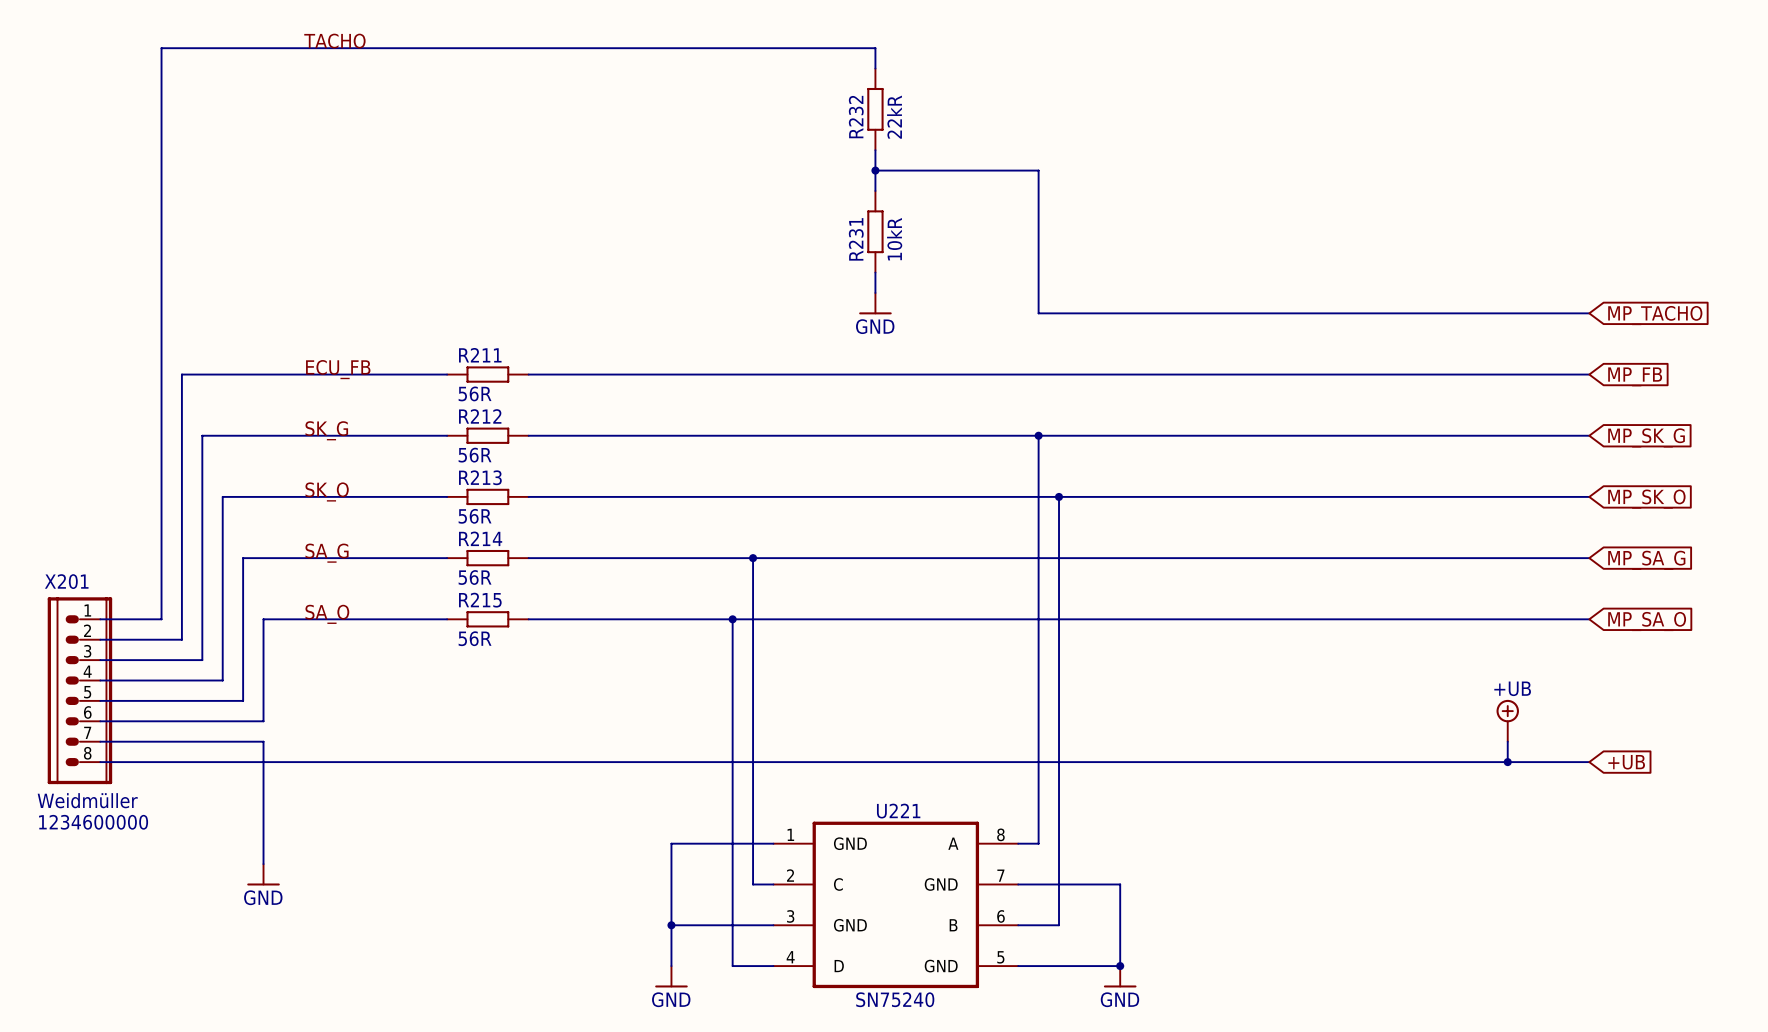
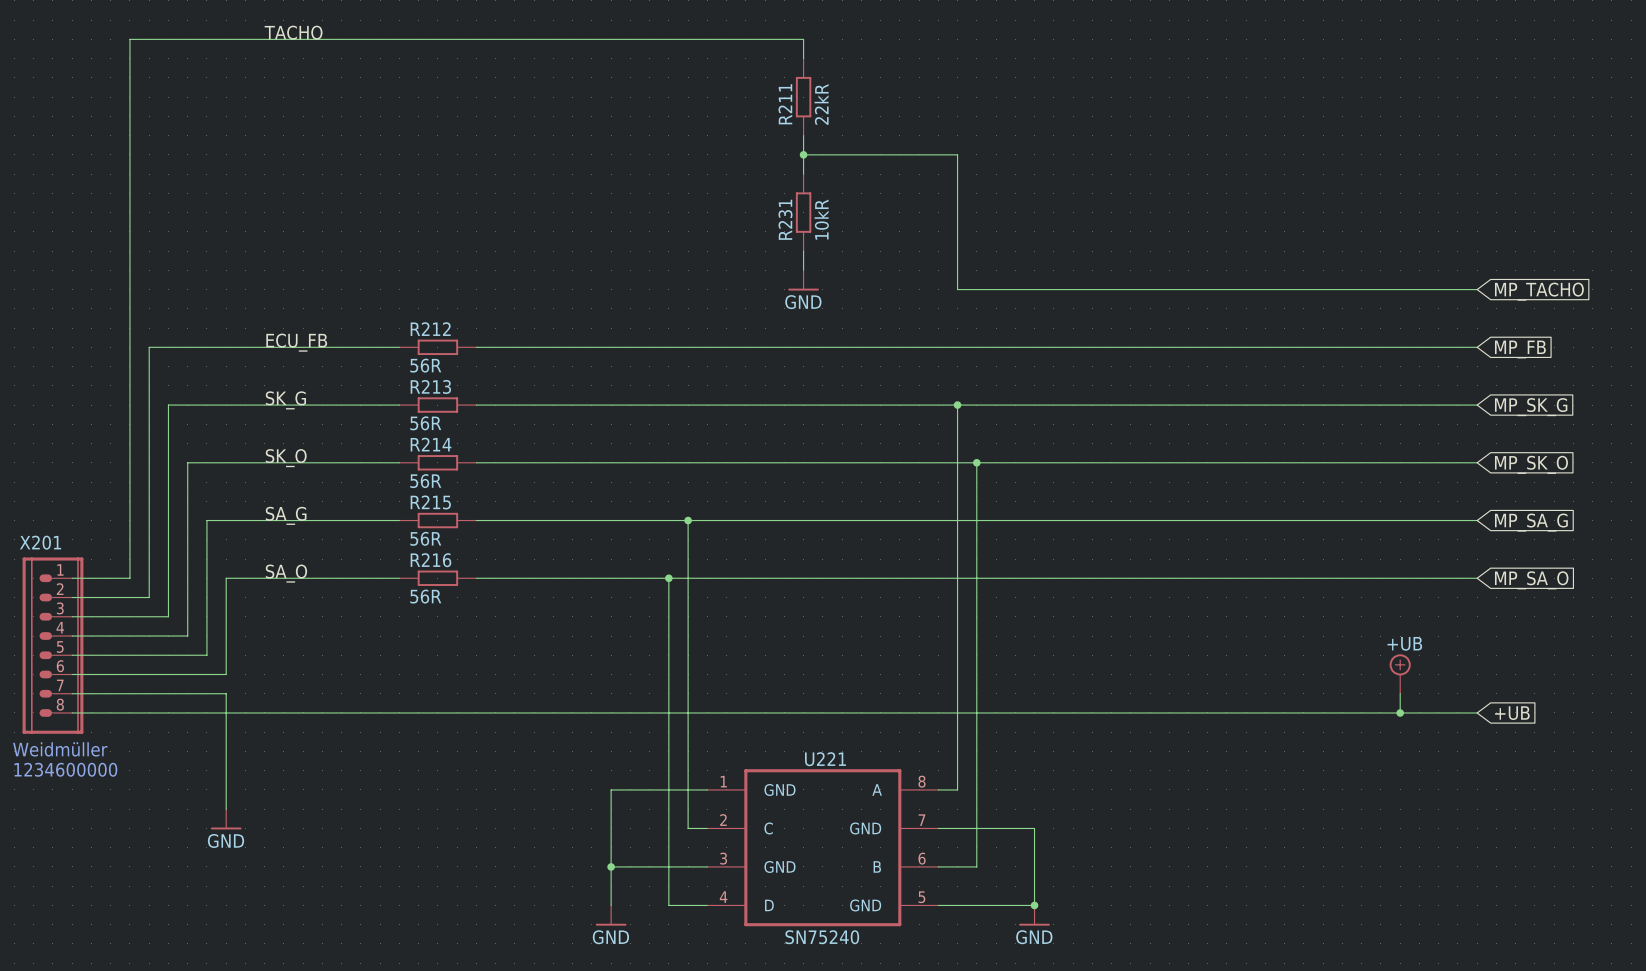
R232 name: R232 (856, 117) -> R211 (785, 104)
R211 name: R211 (480, 355) -> R212 (430, 329)
R212 name: R212 (480, 416) -> R213 (430, 386)
R213 name: R213 (480, 477) -> R214 (431, 444)
R214 name: R214 (480, 538) -> R215 (430, 502)
R215 name: R215 (480, 600) -> R216 (430, 560)

